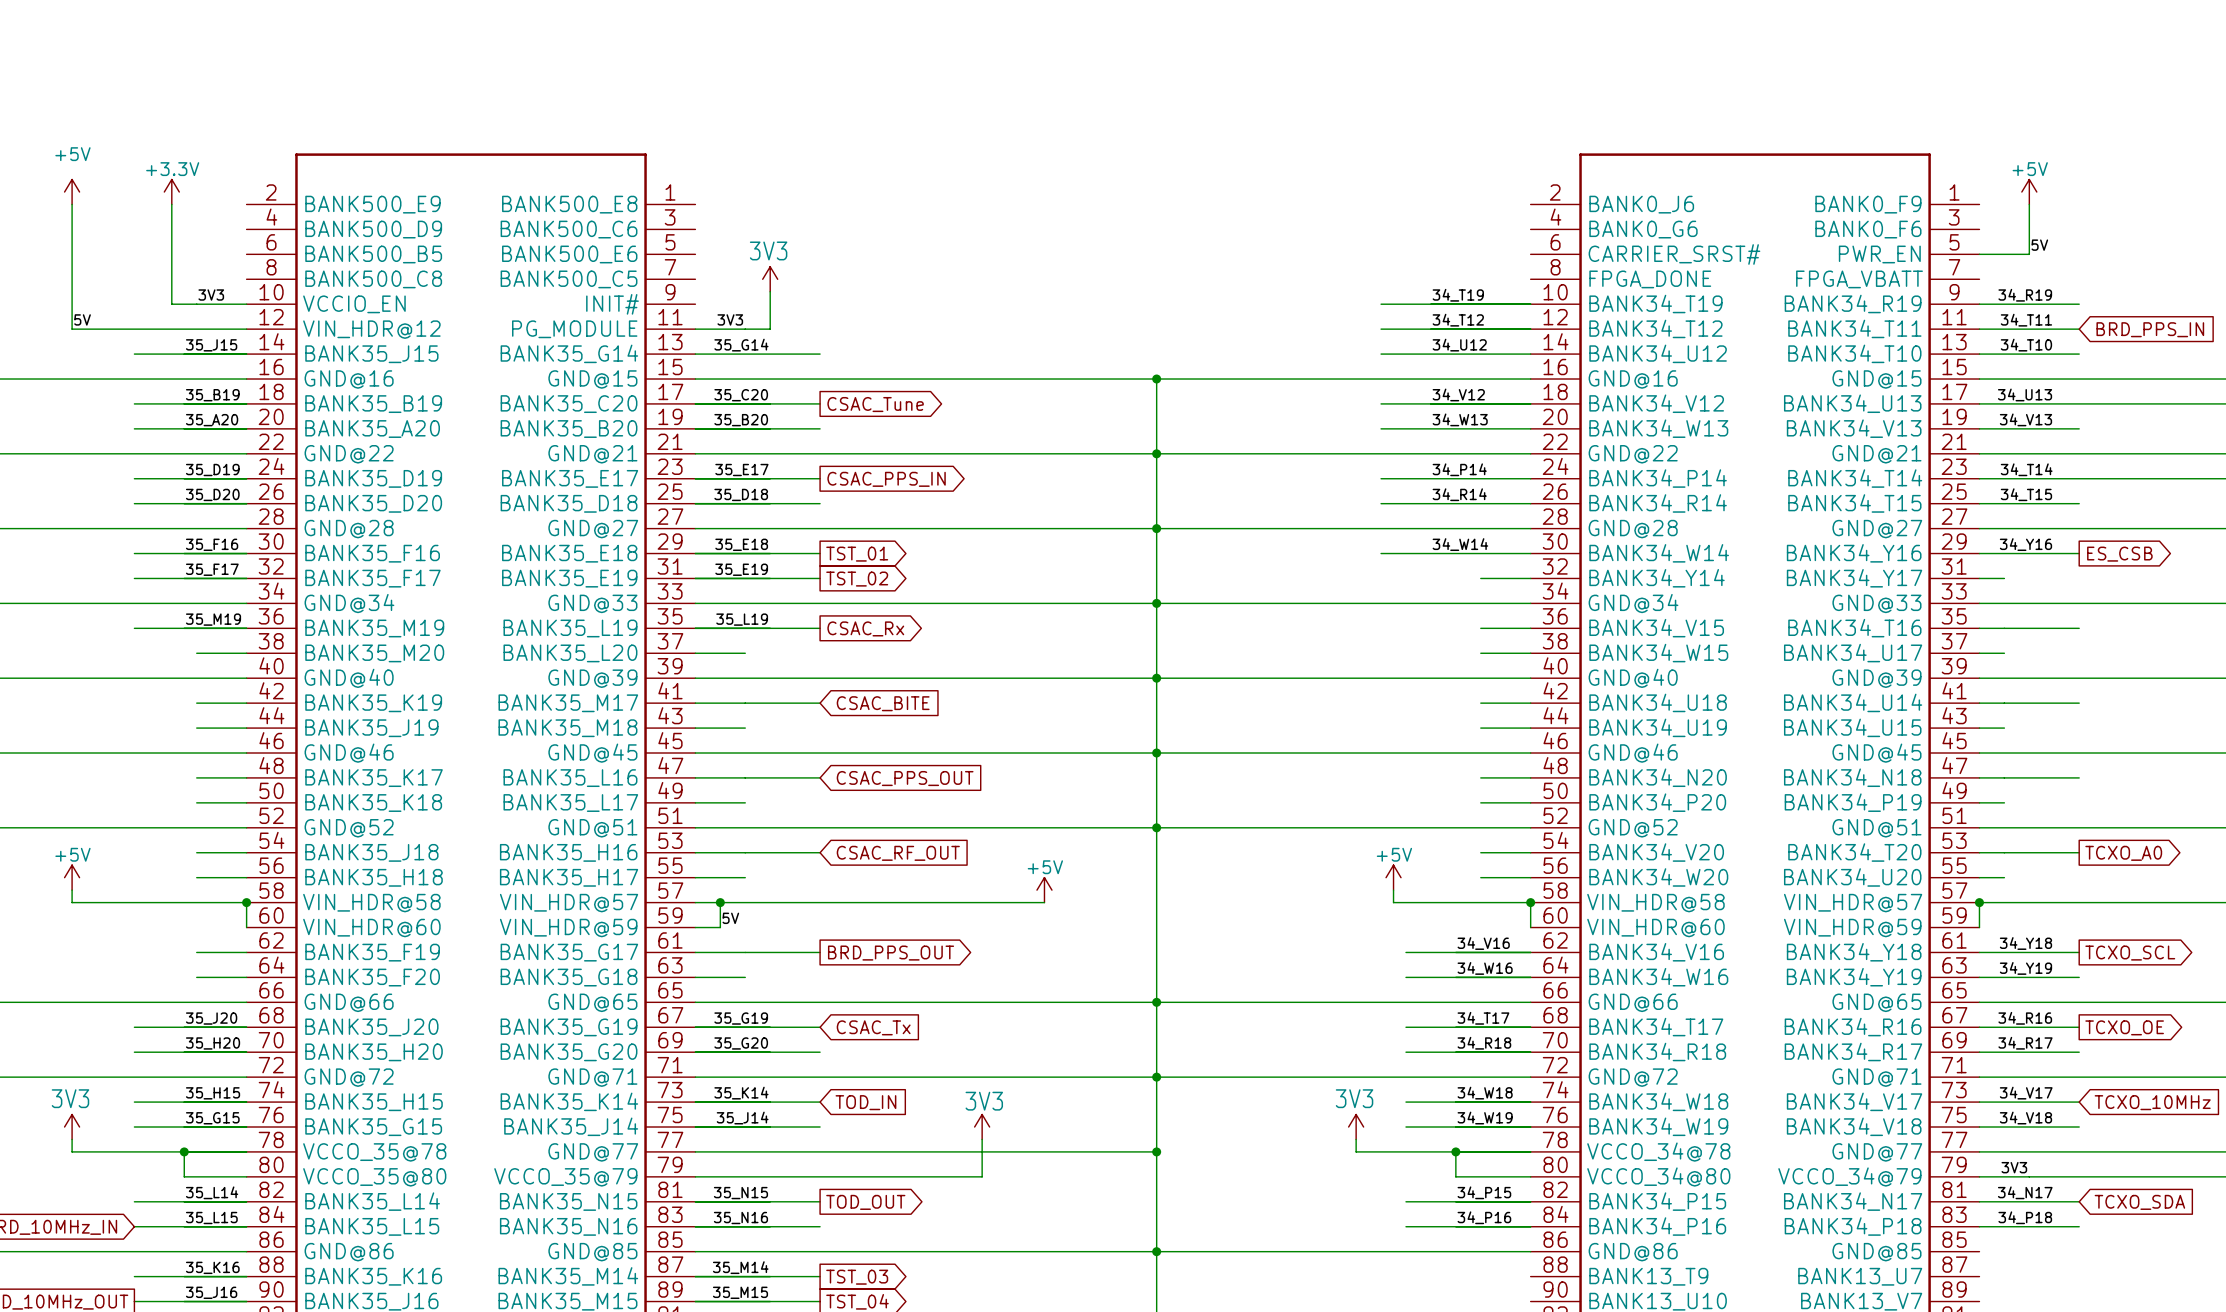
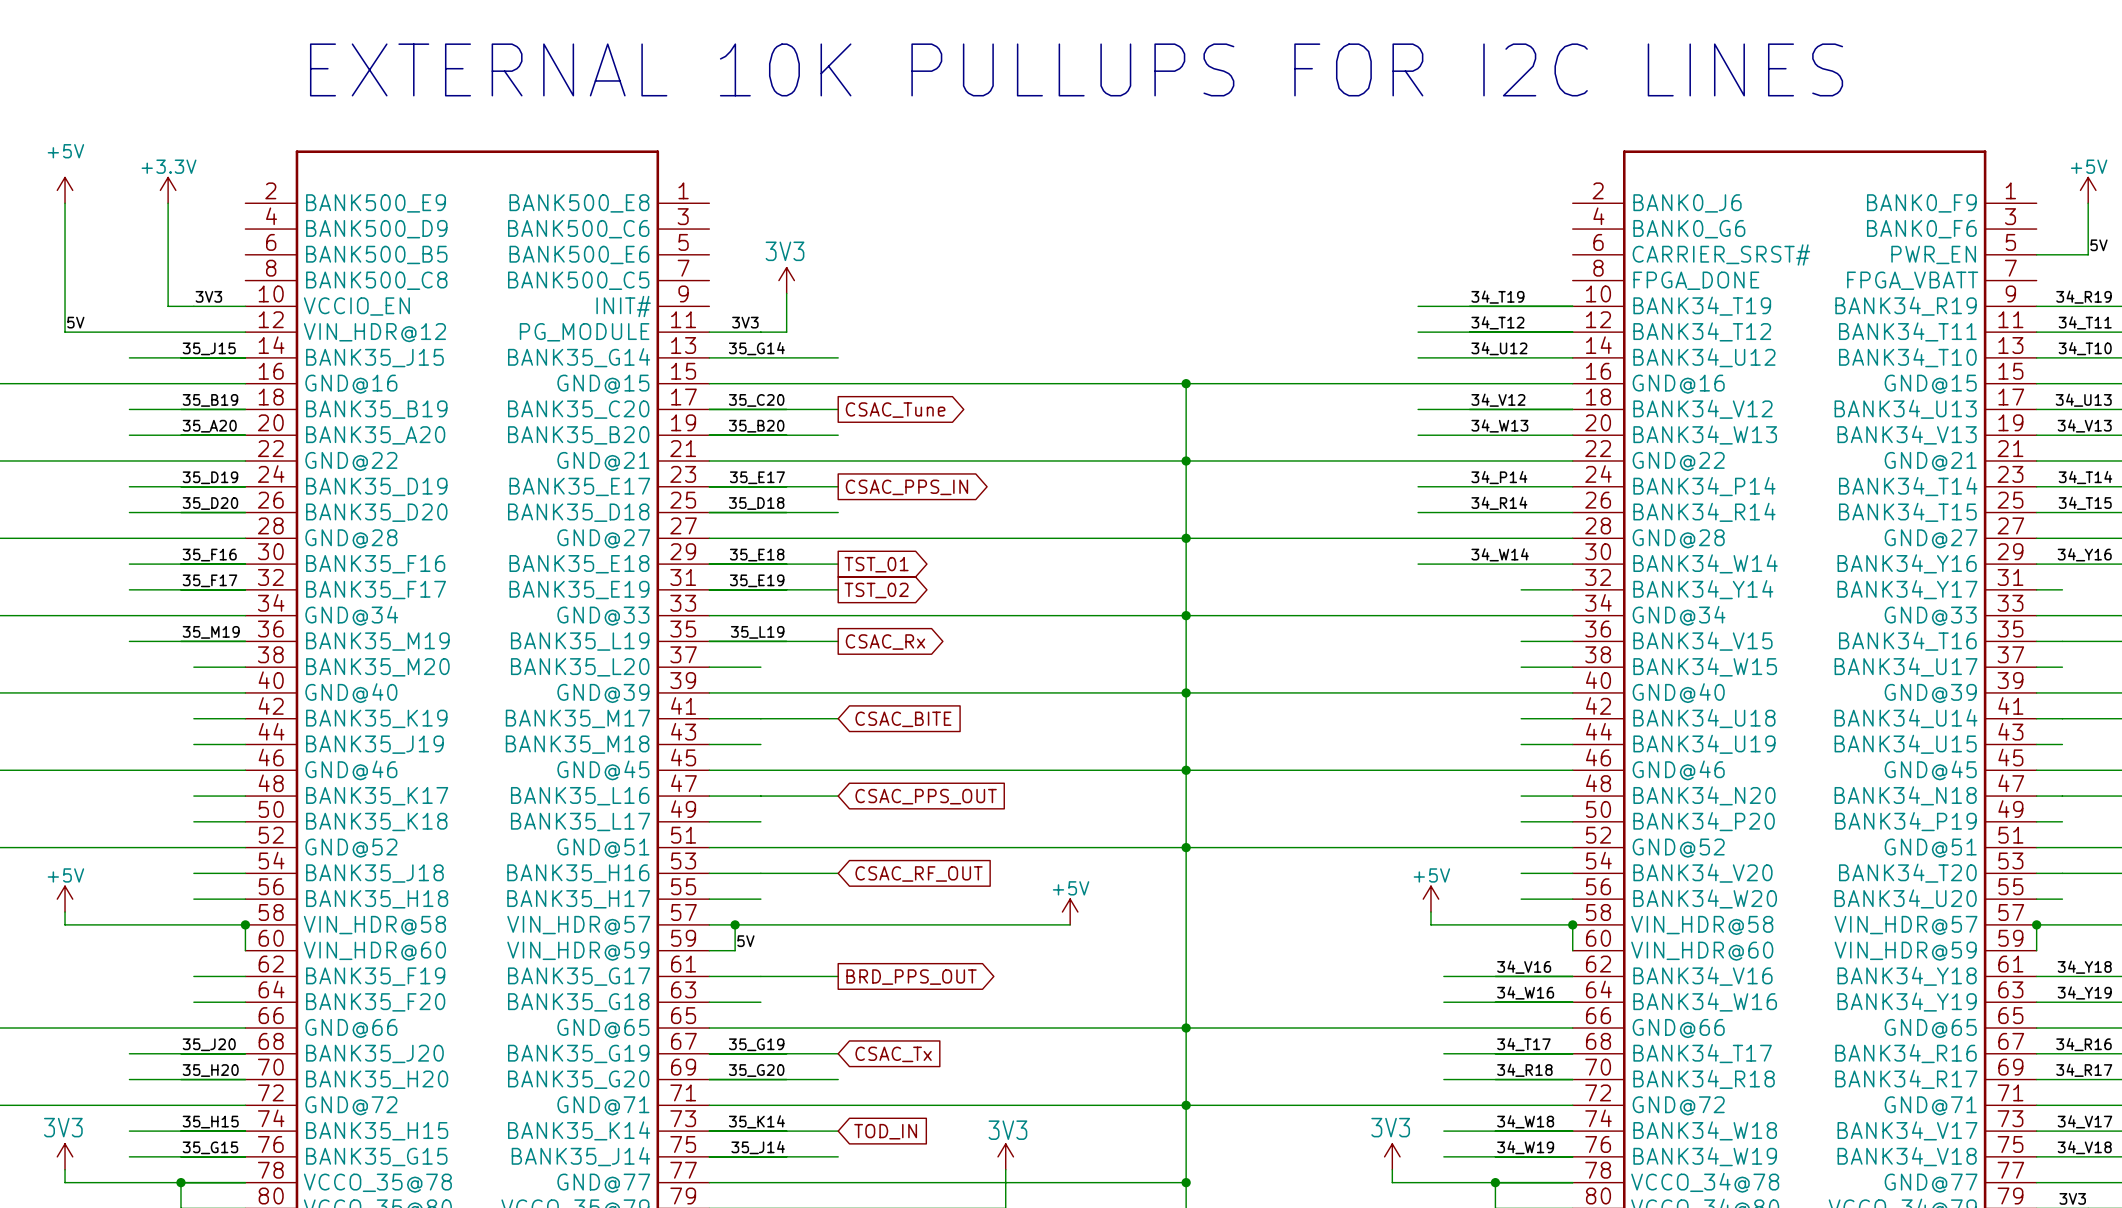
text: none -> EXTERNAL 10K PULLUPS FOR I2C LINES (1076, 69)

